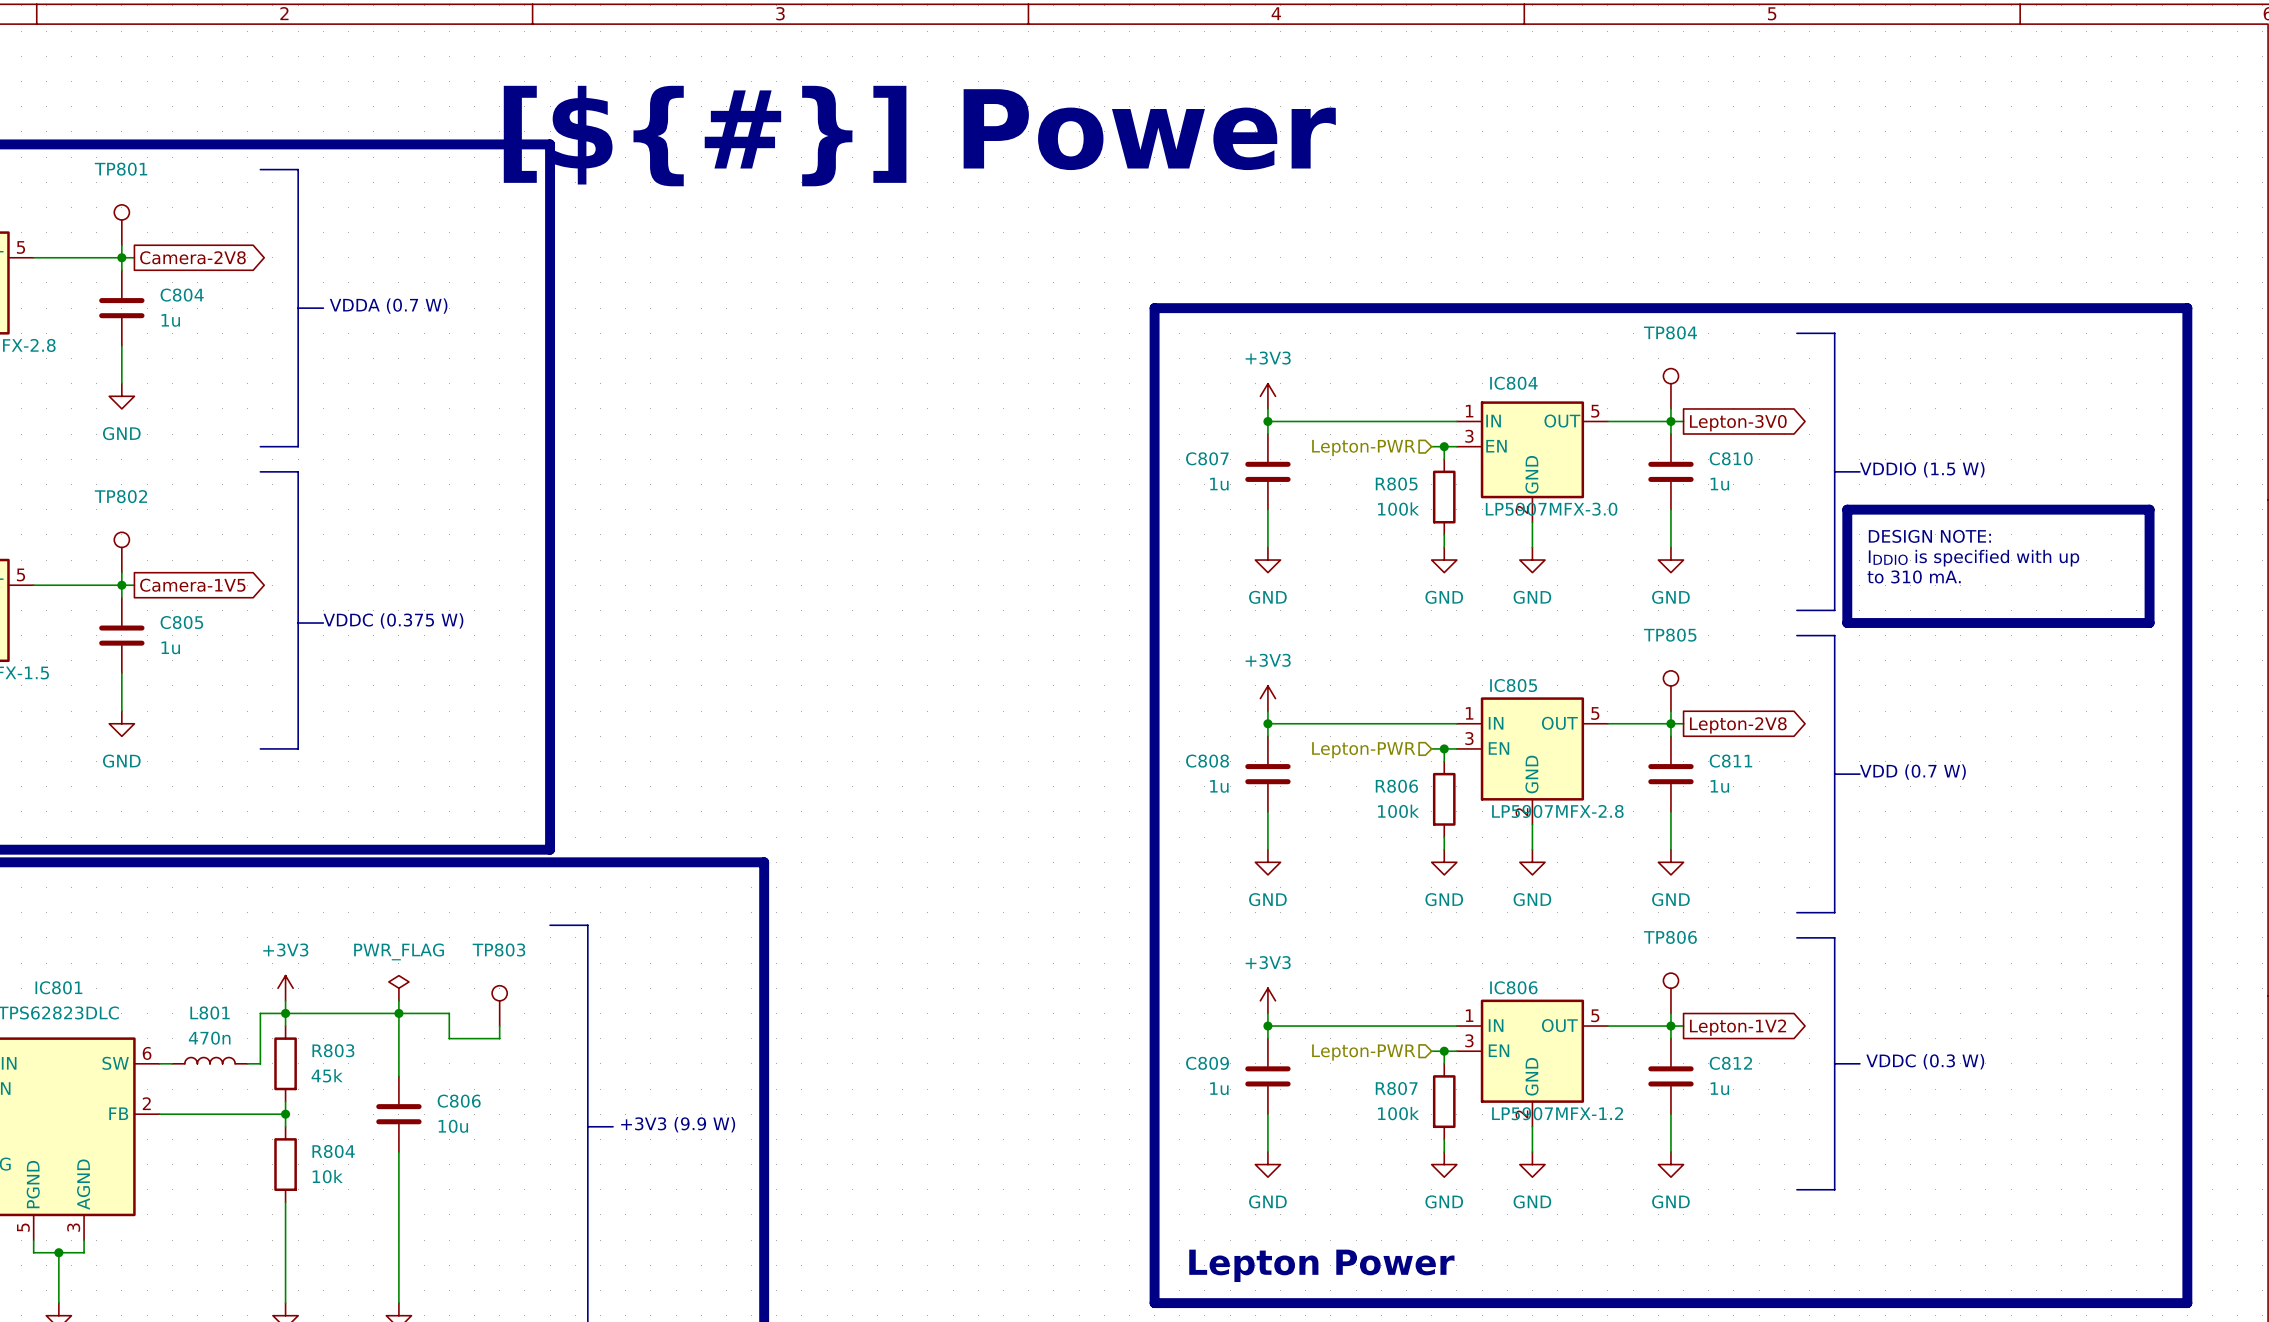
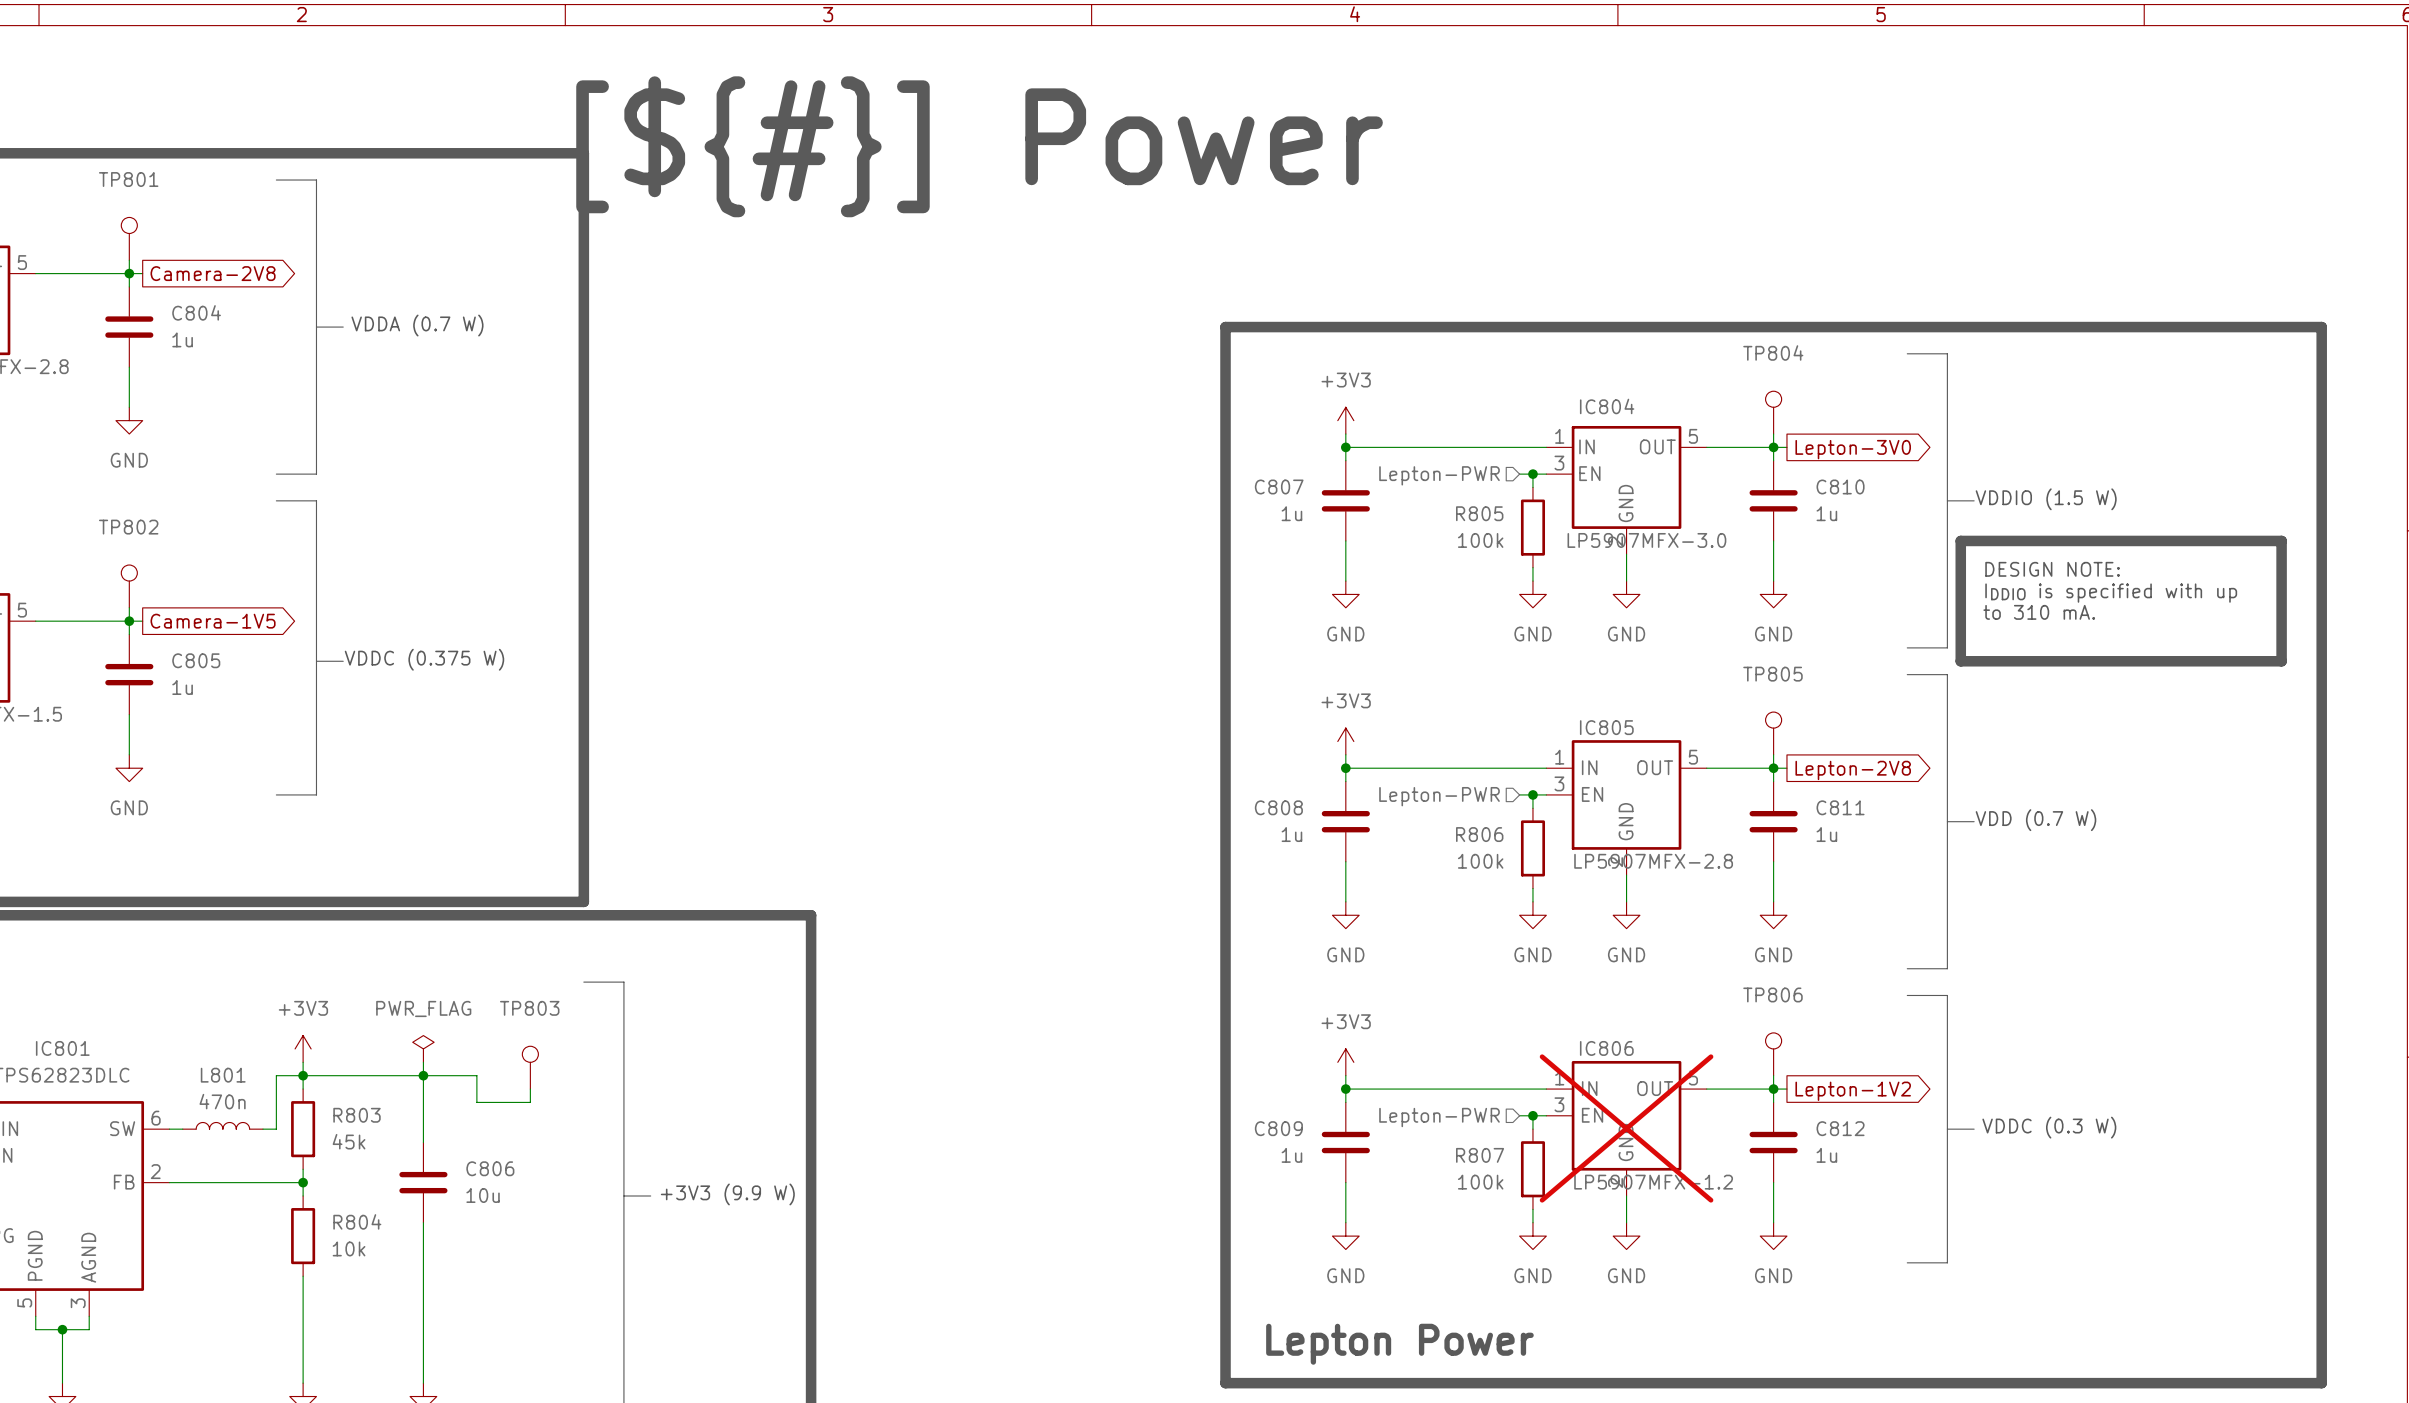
IC806 do-not-place cross: none -> (1626, 1128)

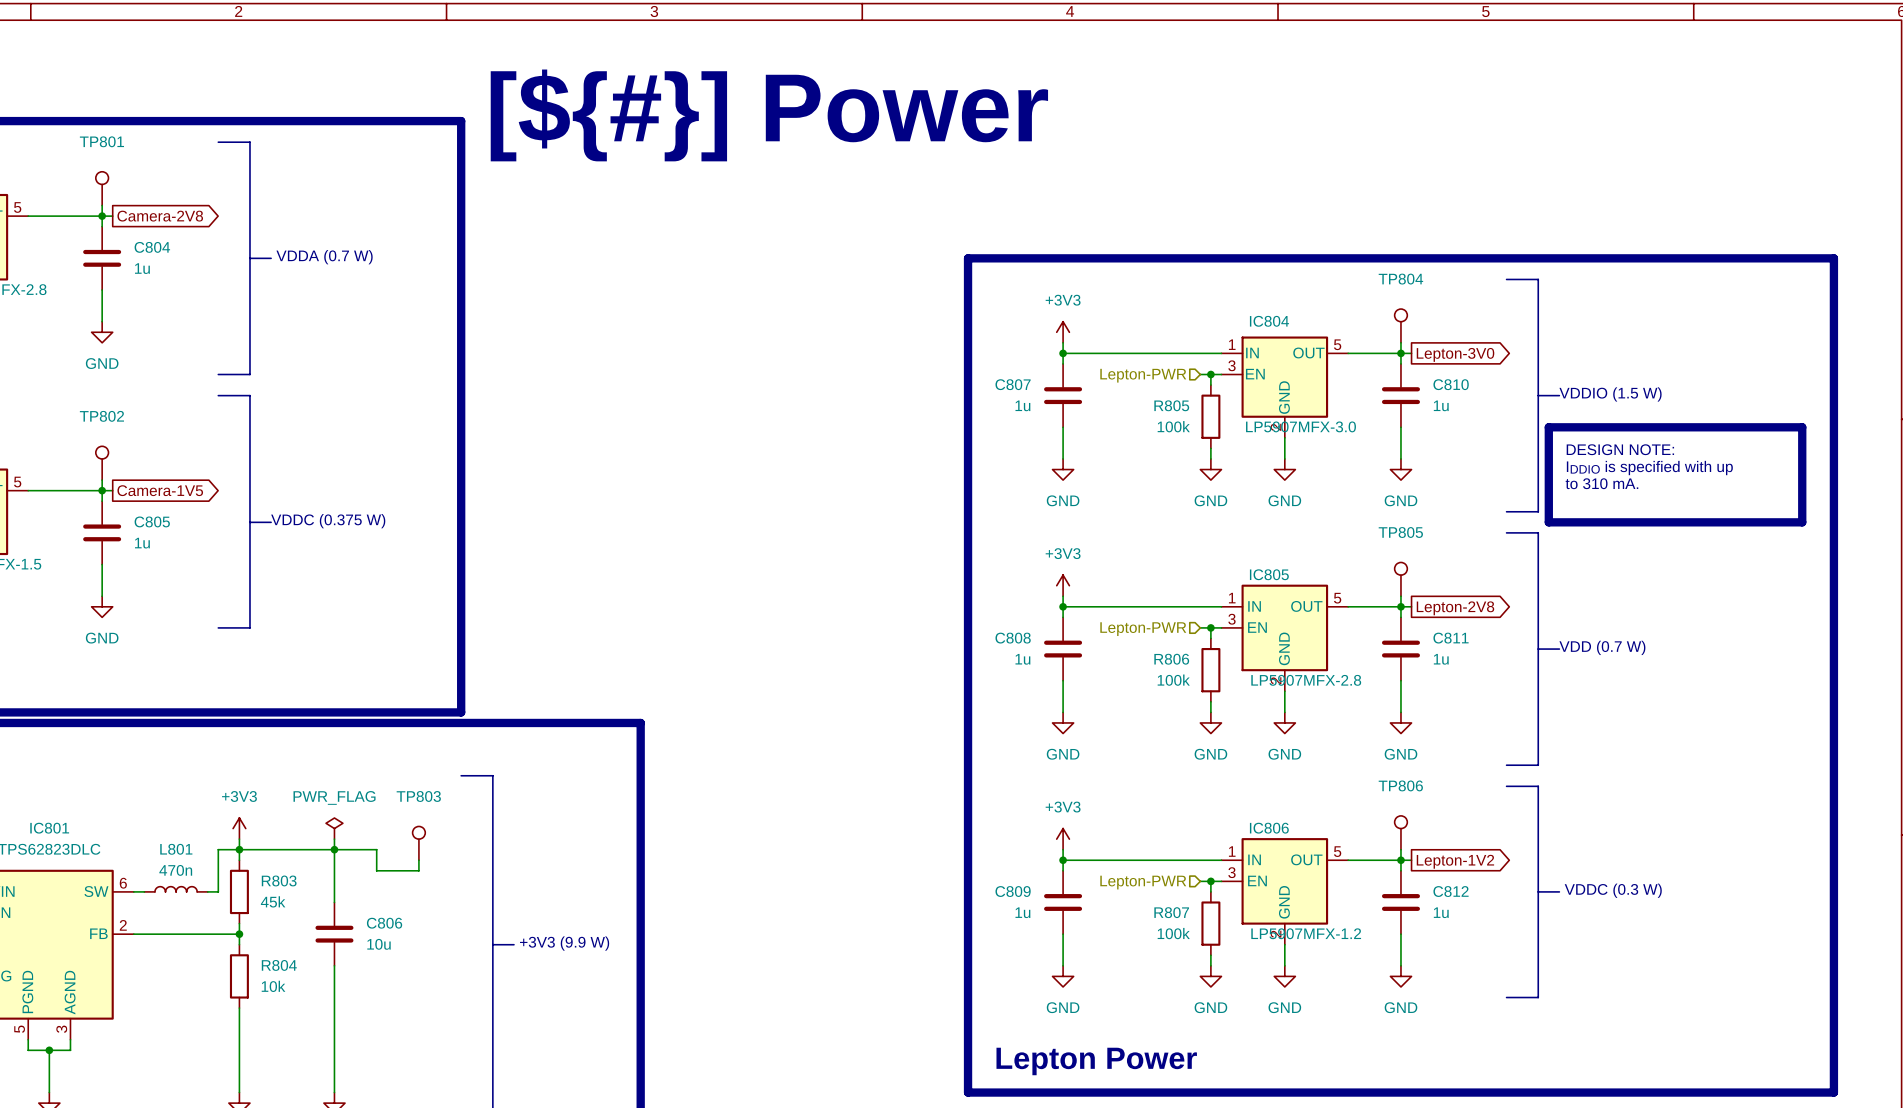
IC806 do-not-place cross: (1626, 1128) -> none

